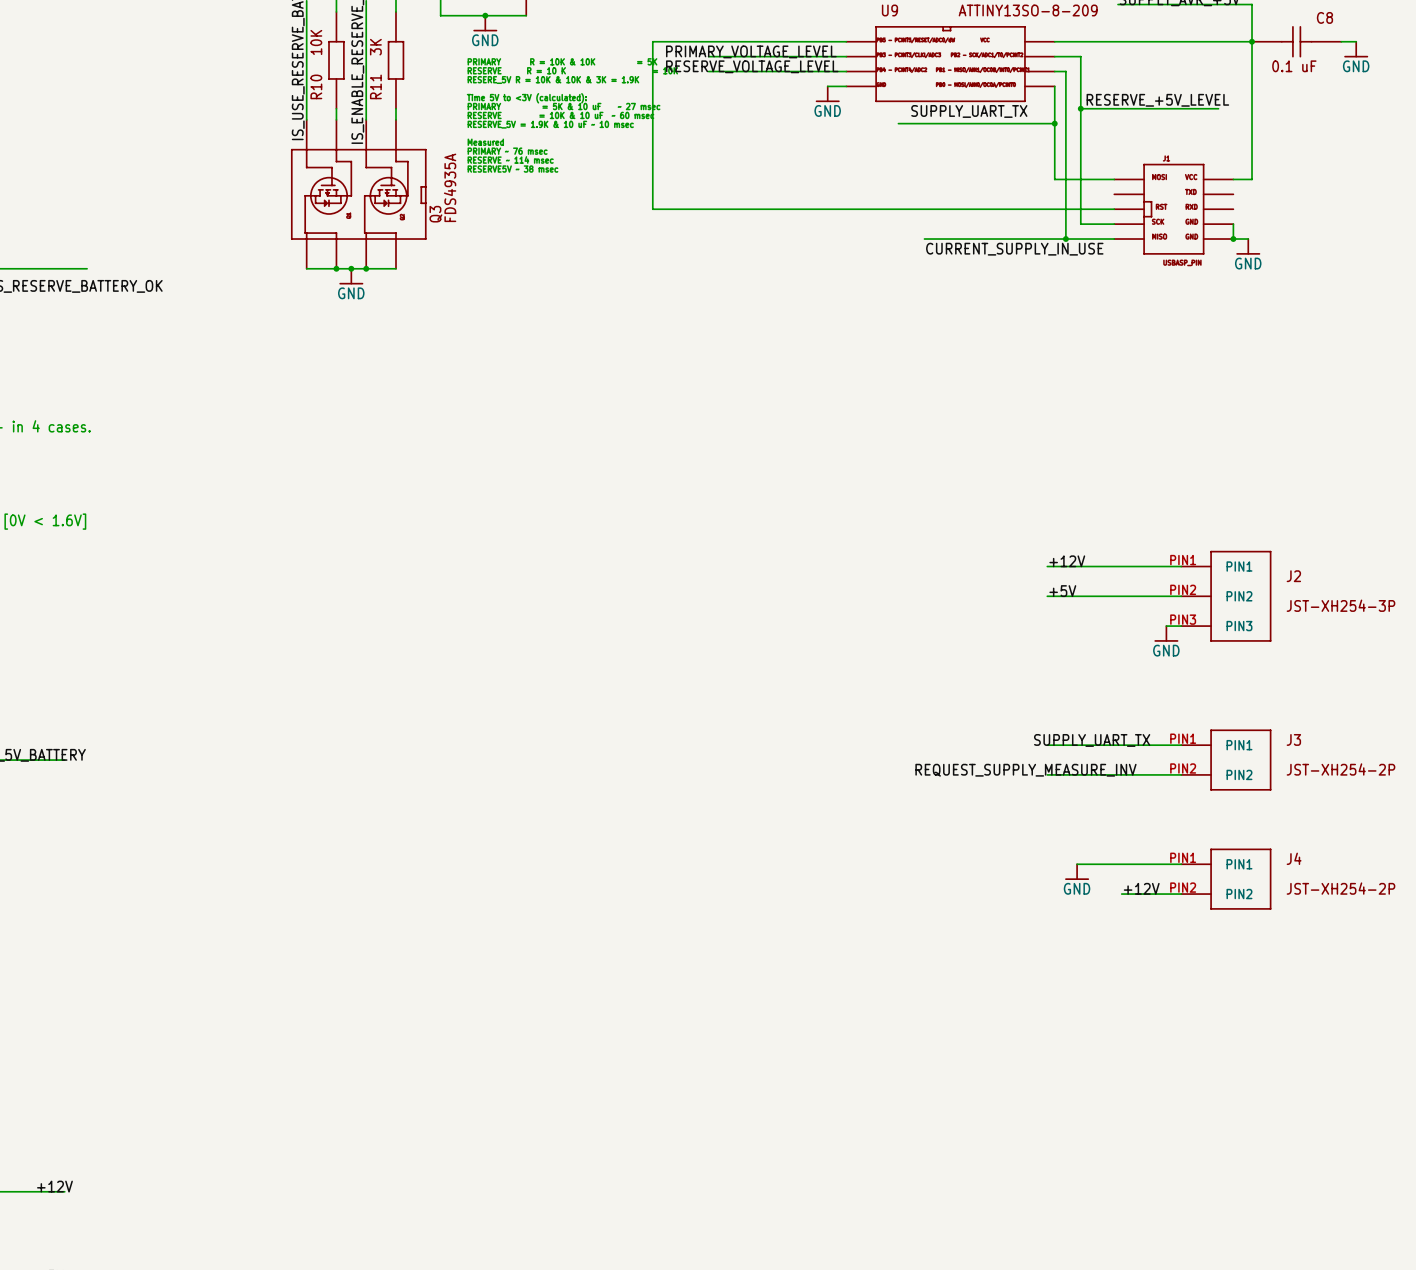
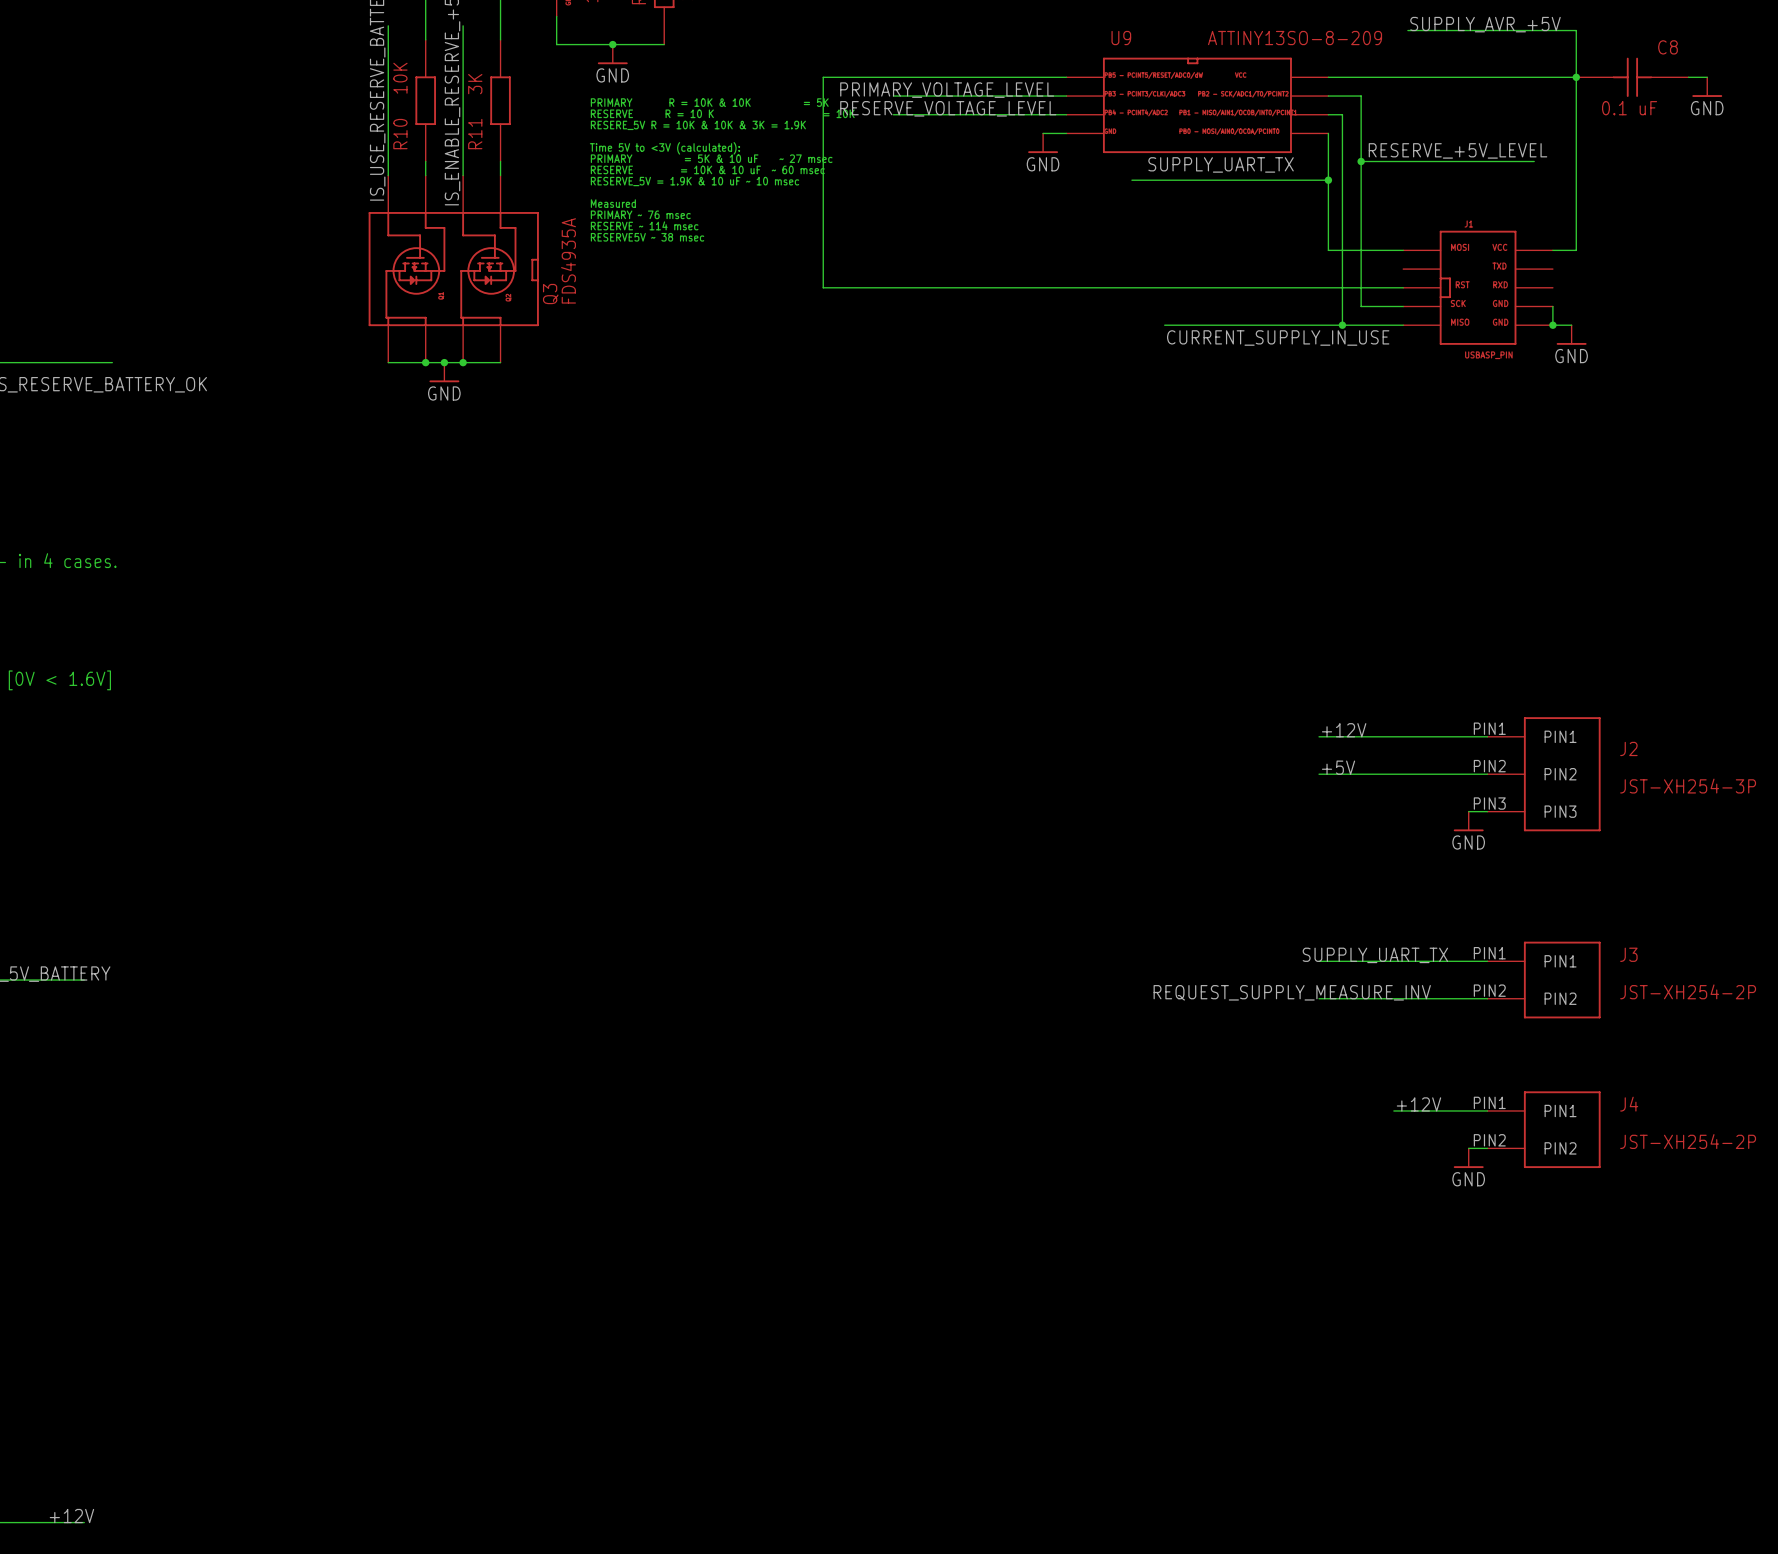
wire: (1077, 864) (1106, 864) -> none
power symbol position: GND (1077, 872) -> GND (1468, 1158)
label position: +12V (1141, 888) -> +12V (1418, 1104)
wire: (1121, 894) (1166, 894) -> none

